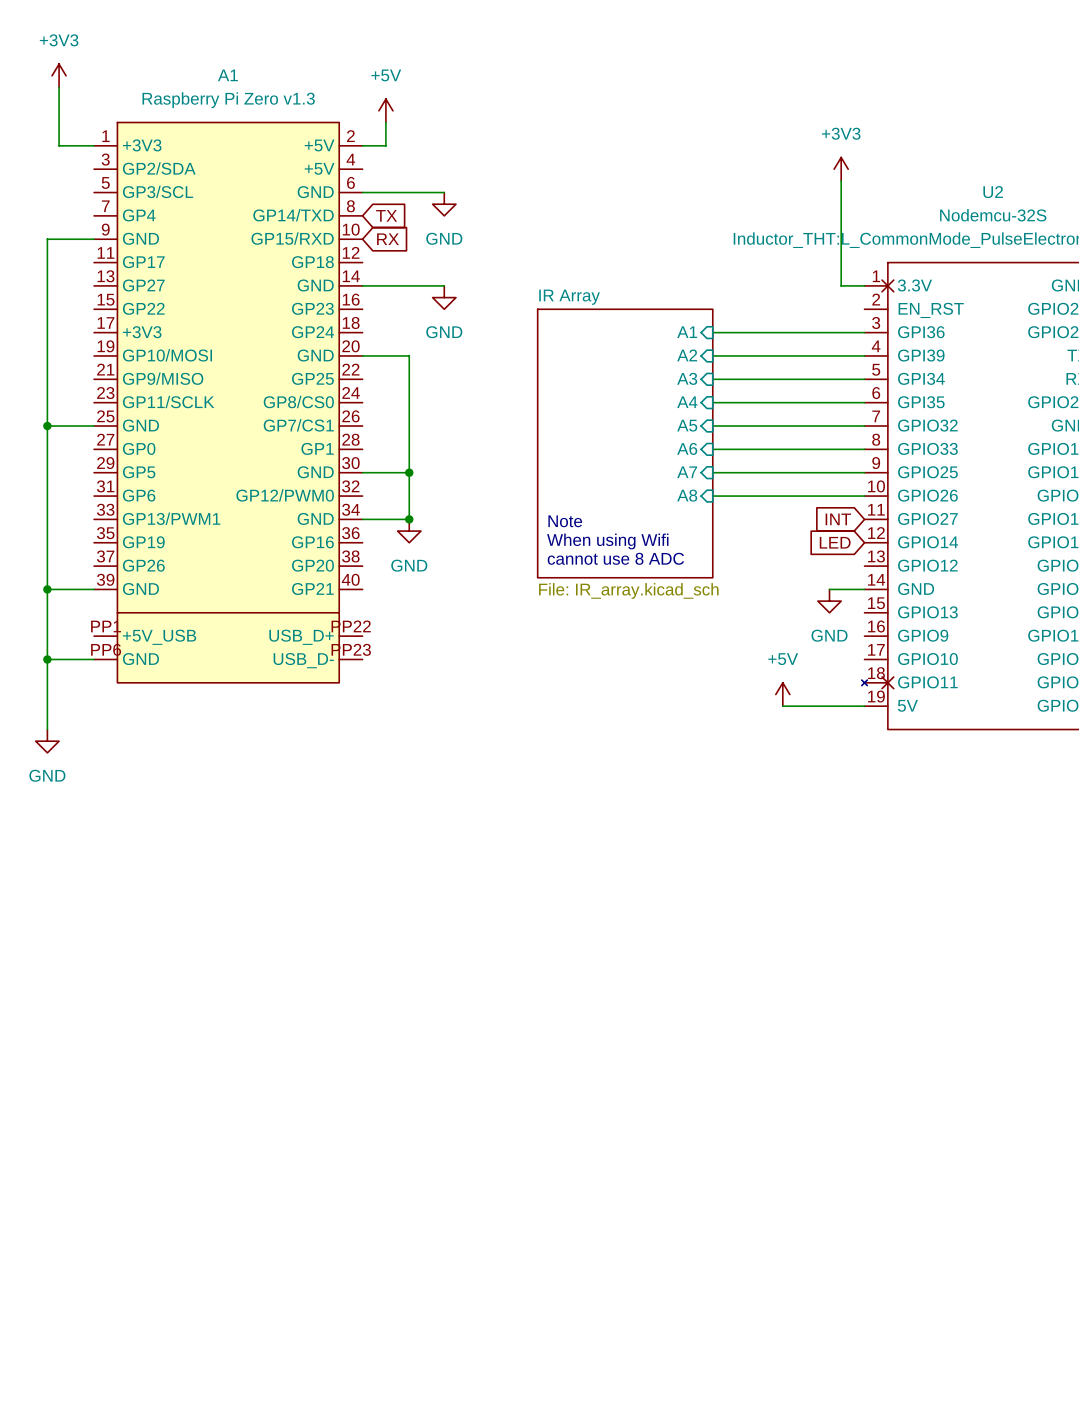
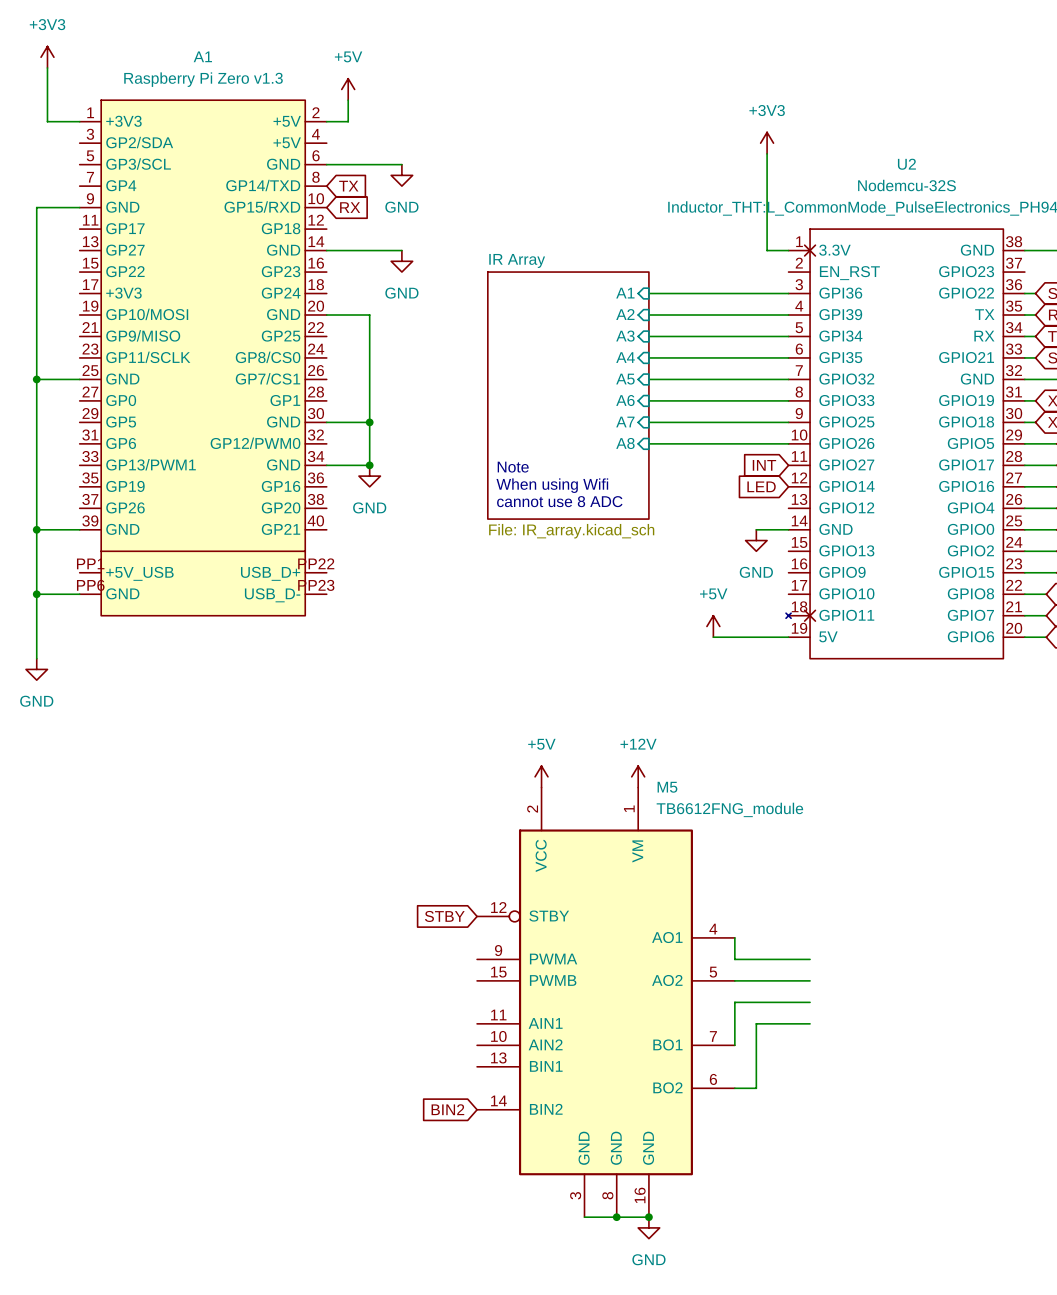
power symbol: none -> +5V (541, 776)
power symbol: none -> +12V (638, 776)
global label: none -> STBY (444, 916)
wire: none -> (734, 937) (734, 959) (810, 959)
wire: none -> (734, 980) (810, 980)
M5: none -> TB6612FNG_module (605, 1002)
wire: none -> (810, 1002) (734, 1002) (734, 1045)
wire: none -> (810, 1023) (756, 1023) (756, 1088) (734, 1088)
global label: none -> BIN2 (447, 1109)
wire: none -> (584, 1217) (648, 1217)
junction: none -> (616, 1217)
junction: none -> (648, 1217)
power symbol: none -> GND (648, 1227)

